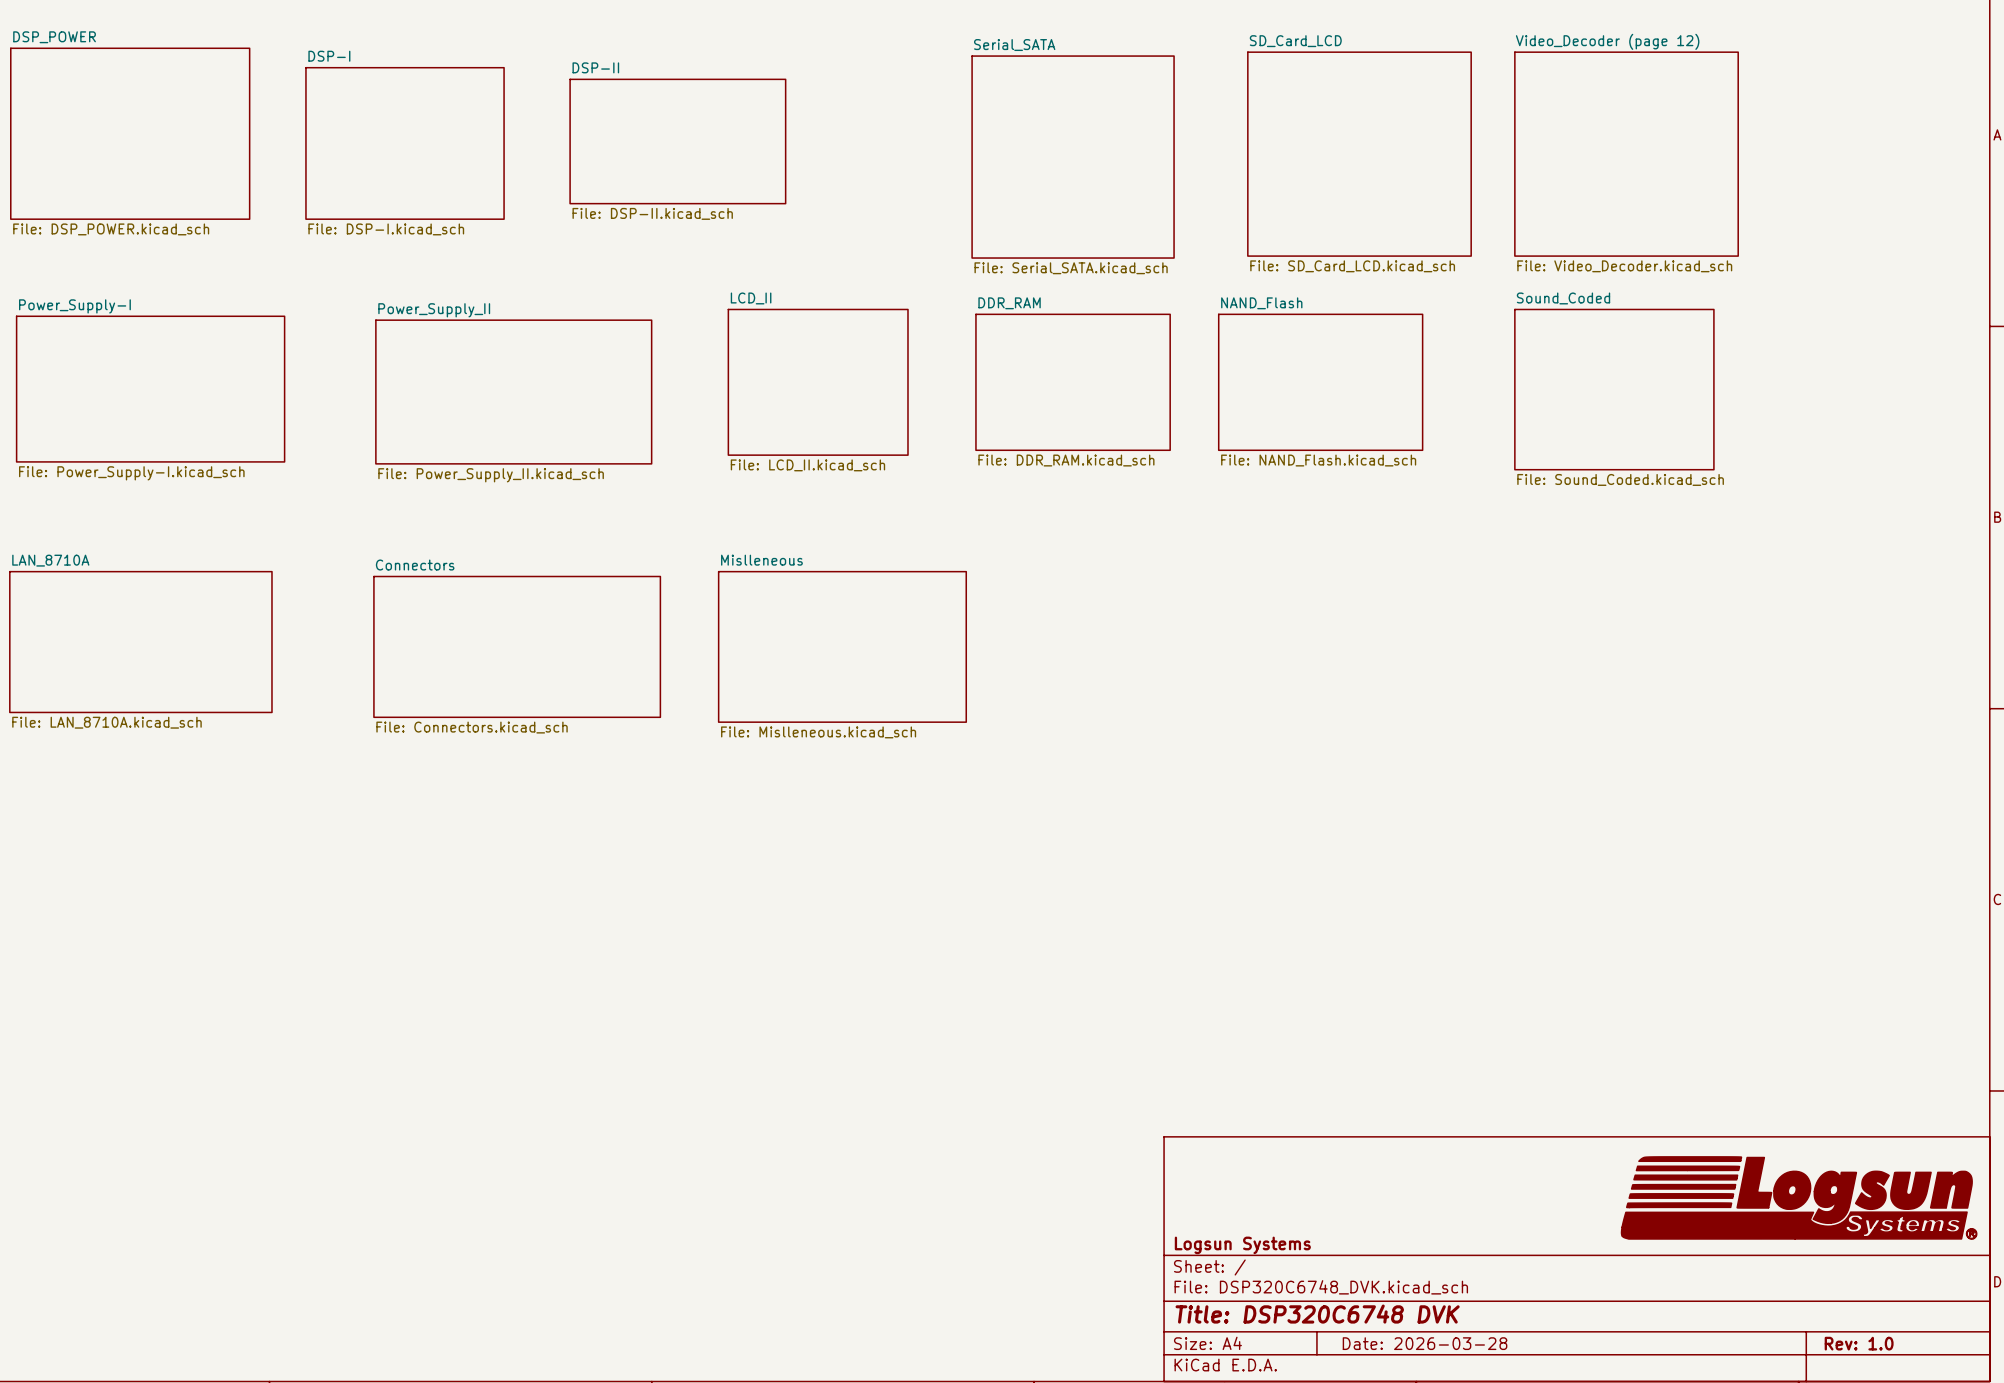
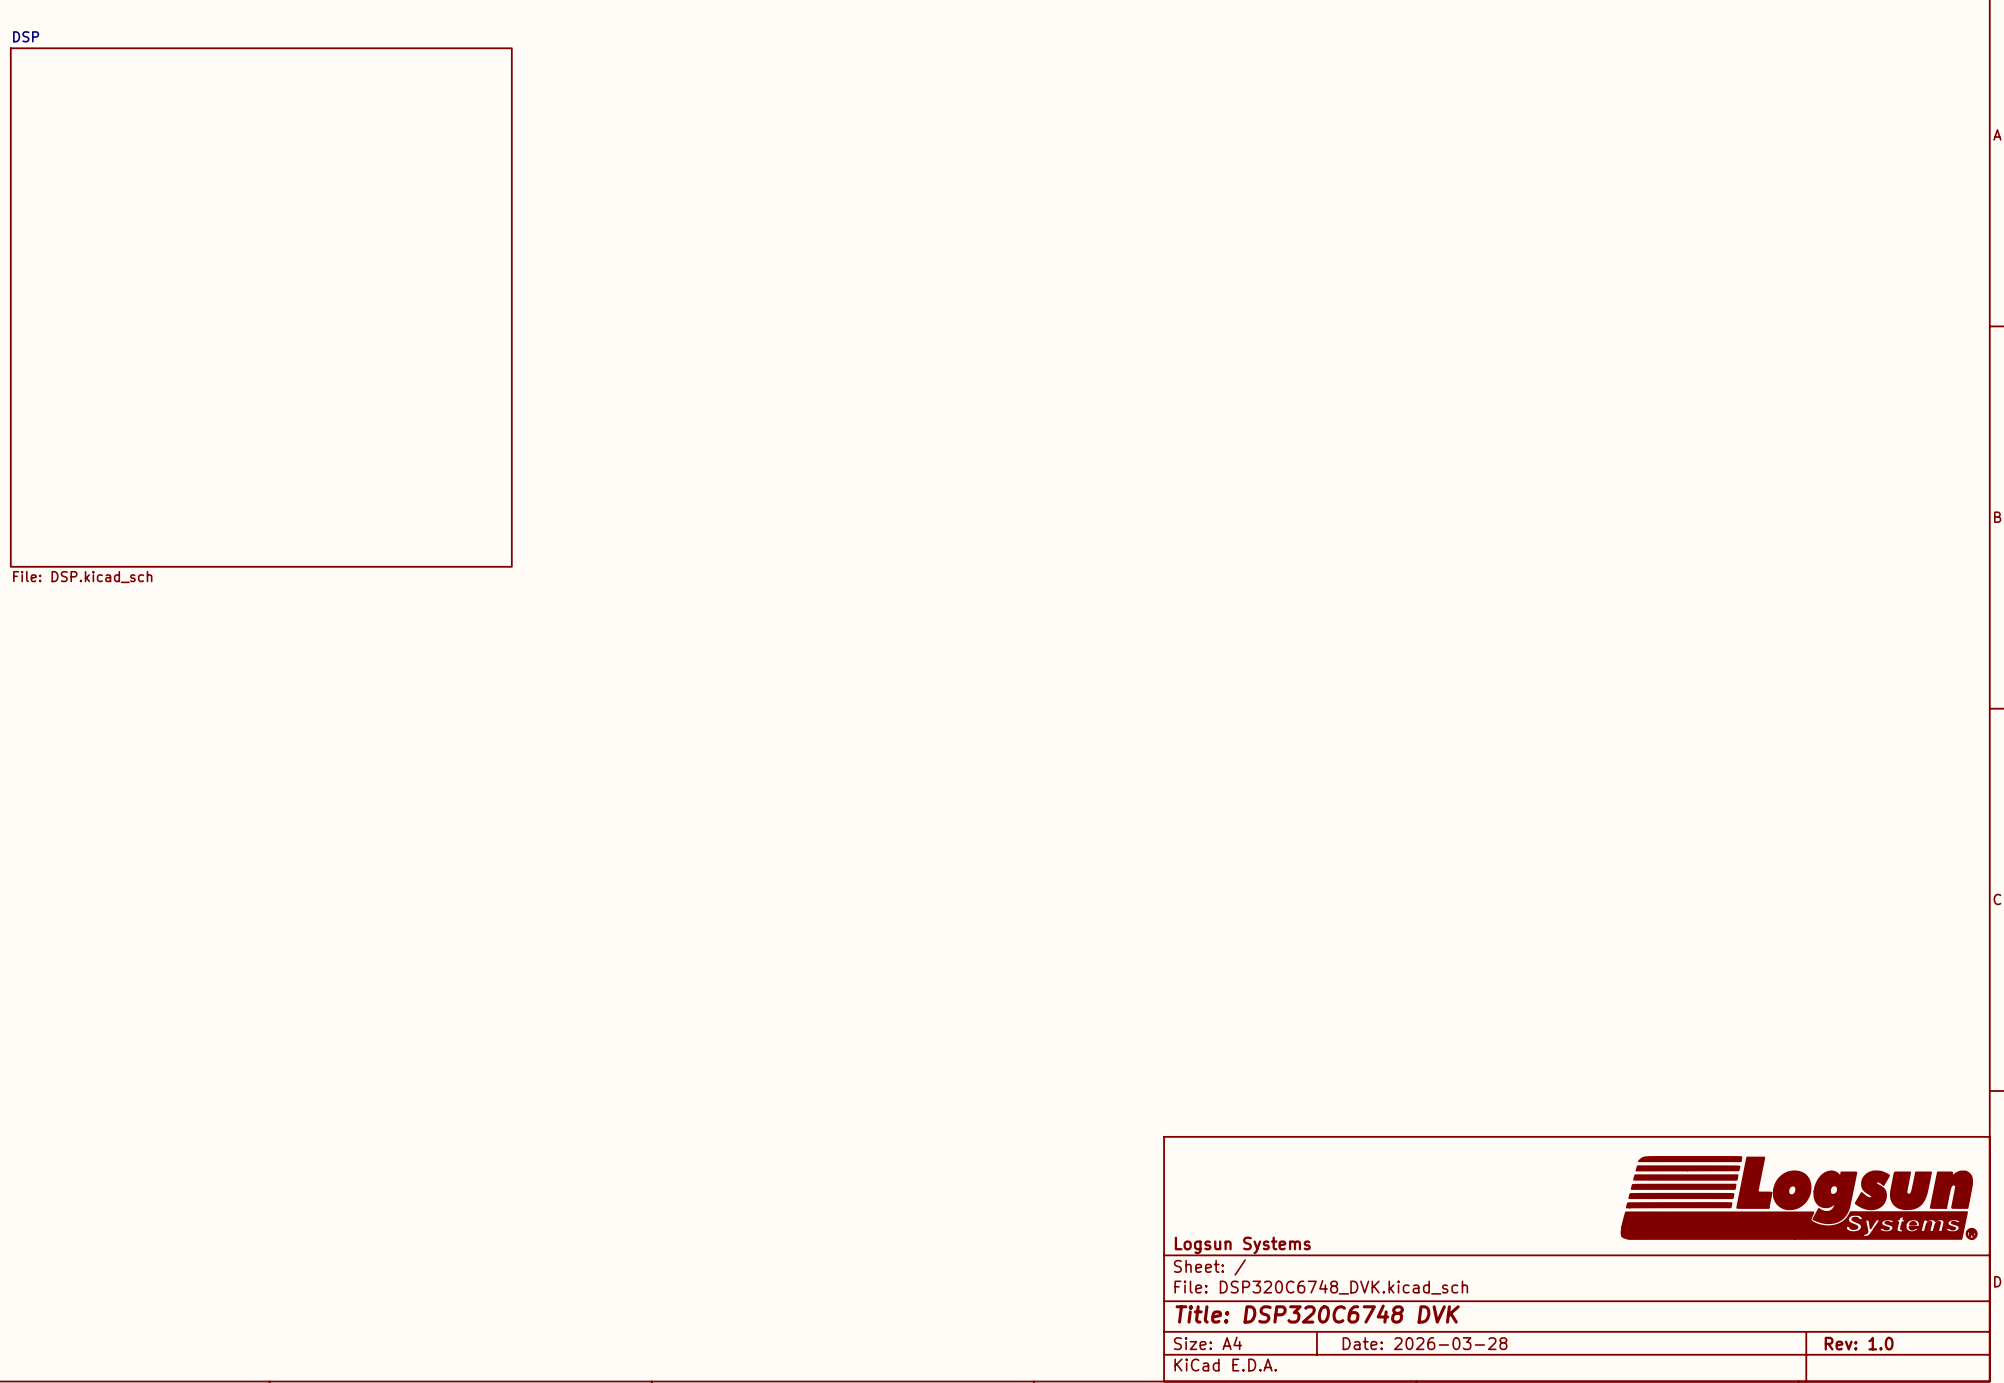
sheet DSP_POWER: File: DSP_POWER.kicad_sch (130, 133) -> none
sheet DSP-II: File: DSP-II.kicad_sch (677, 141) -> none
sheet DSP-I: File: DSP-I.kicad_sch (405, 143) -> none
sheet SD_Card_LCD: File: SD_Card_LCD.kicad_sch (1359, 154) -> none
sheet Video_Decoder (page 12): File: Video_Decoder.kicad_sch (1626, 154) -> none
sheet Serial_SATA: File: Serial_SATA.kicad_sch (1073, 157) -> none
sheet DSP: none -> File: DSP.kicad_sch (261, 307)
sheet LCD_II: File: LCD_II.kicad_sch (818, 382) -> none
sheet DDR_RAM: File: DDR_RAM.kicad_sch (1073, 382) -> none
sheet NAND_Flash: File: NAND_Flash.kicad_sch (1320, 382) -> none
sheet Power_Supply-I: File: Power_Supply-I.kicad_sch (150, 389) -> none
sheet Sound_Coded: File: Sound_Coded.kicad_sch (1614, 389) -> none
sheet Power_Supply_II: File: Power_Supply_II.kicad_sch (513, 392) -> none
sheet LAN_8710A: File: LAN_8710A.kicad_sch (140, 642) -> none
sheet Connectors: File: Connectors.kicad_sch (517, 646) -> none
sheet Mislleneous: File: Mislleneous.kicad_sch (842, 646) -> none

